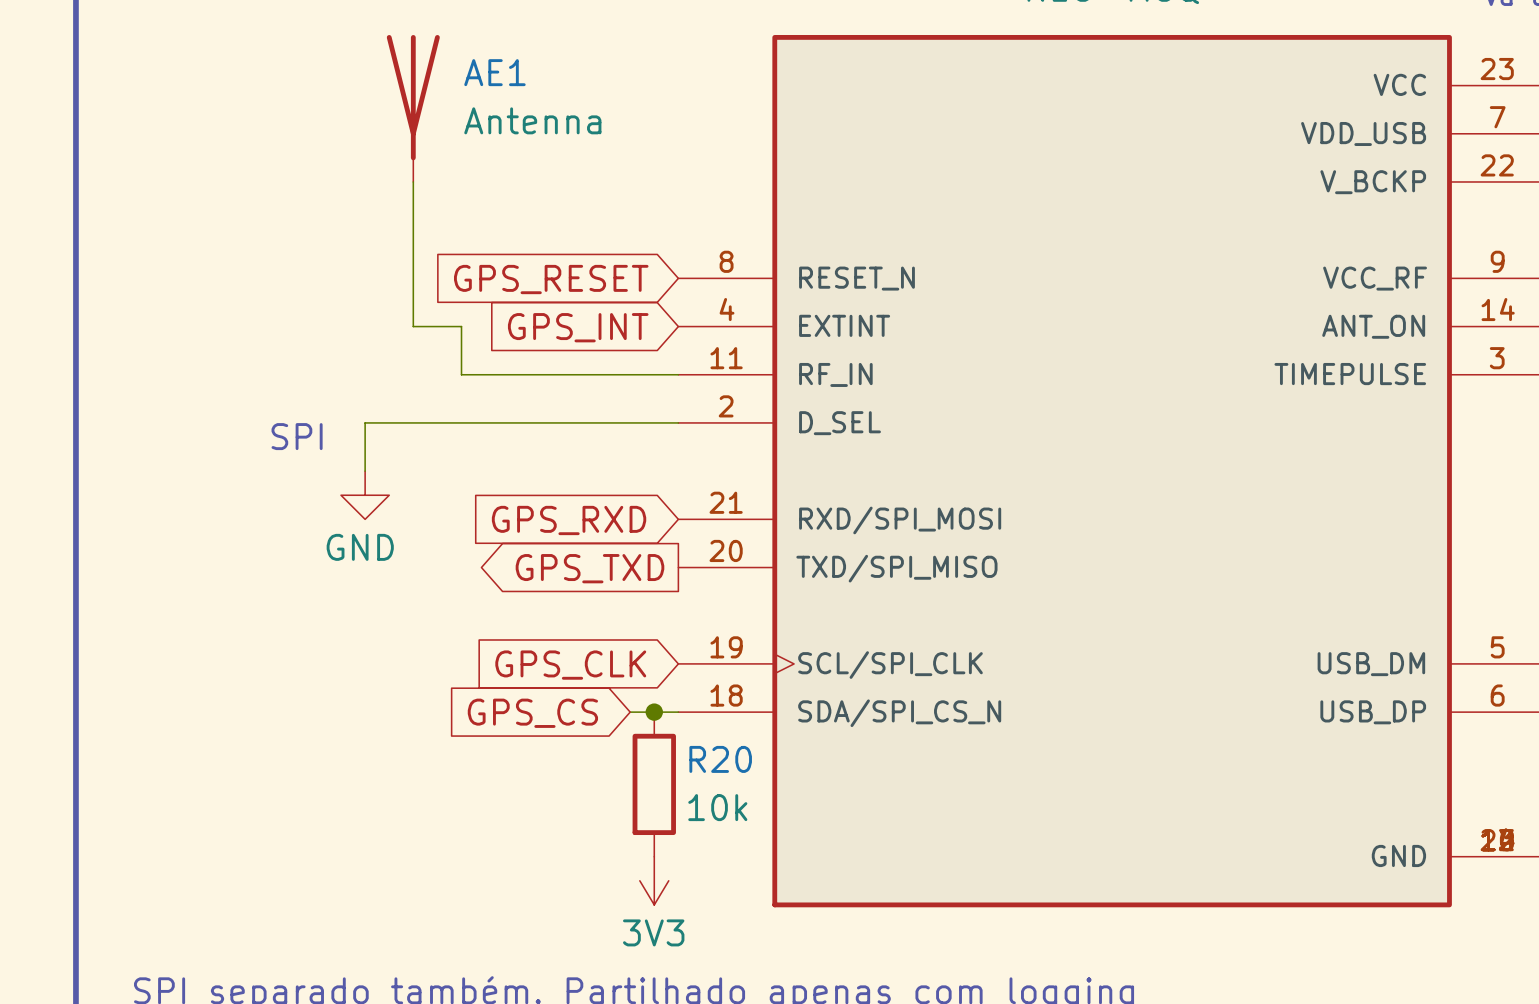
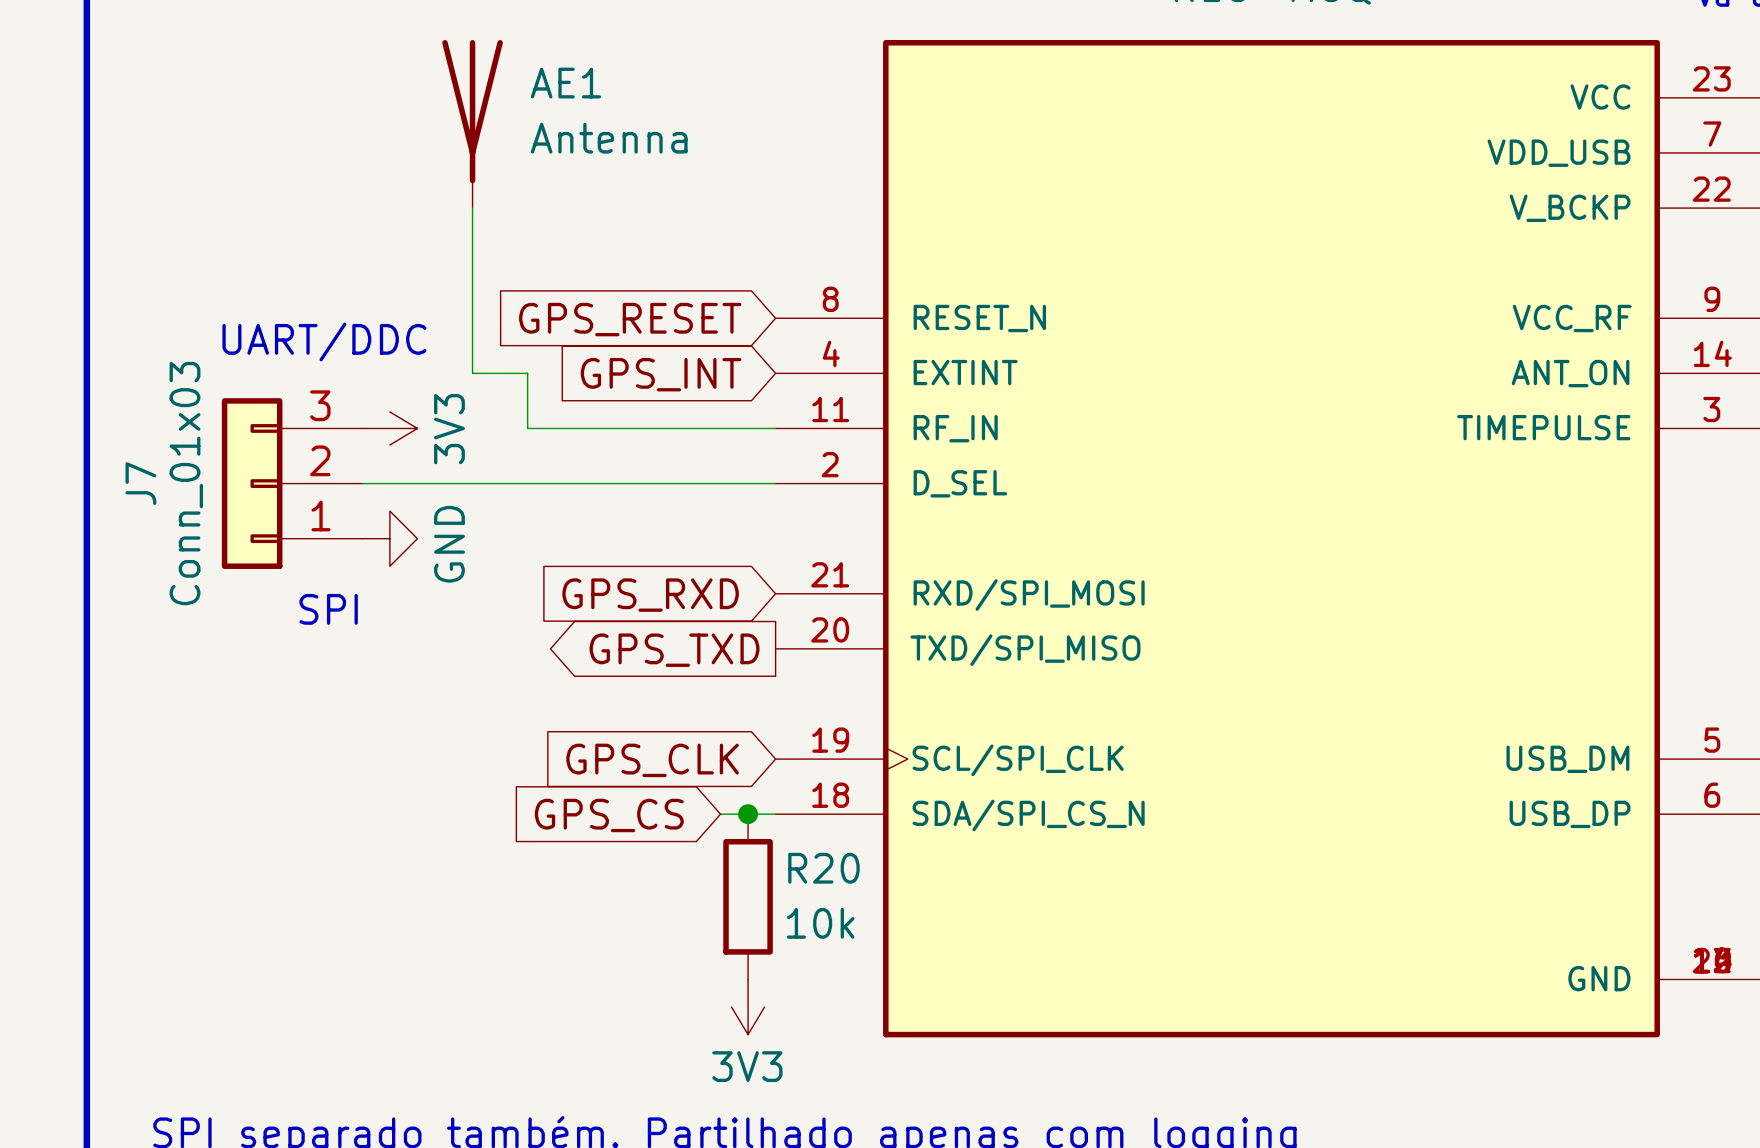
text: none -> UART/DDC (324, 341)
power symbol: none -> 3V3 (389, 428)
J7: none -> Conn_01x03 (292, 483)
wire: (365, 422) (365, 471) -> (417, 483) (362, 483)
text position: SPI (297, 436) -> SPI (328, 609)
power symbol rotation: 0° (365, 495) -> 90° counterclockwise (389, 538)
power symbol position: GND (365, 495) -> GND (389, 538)

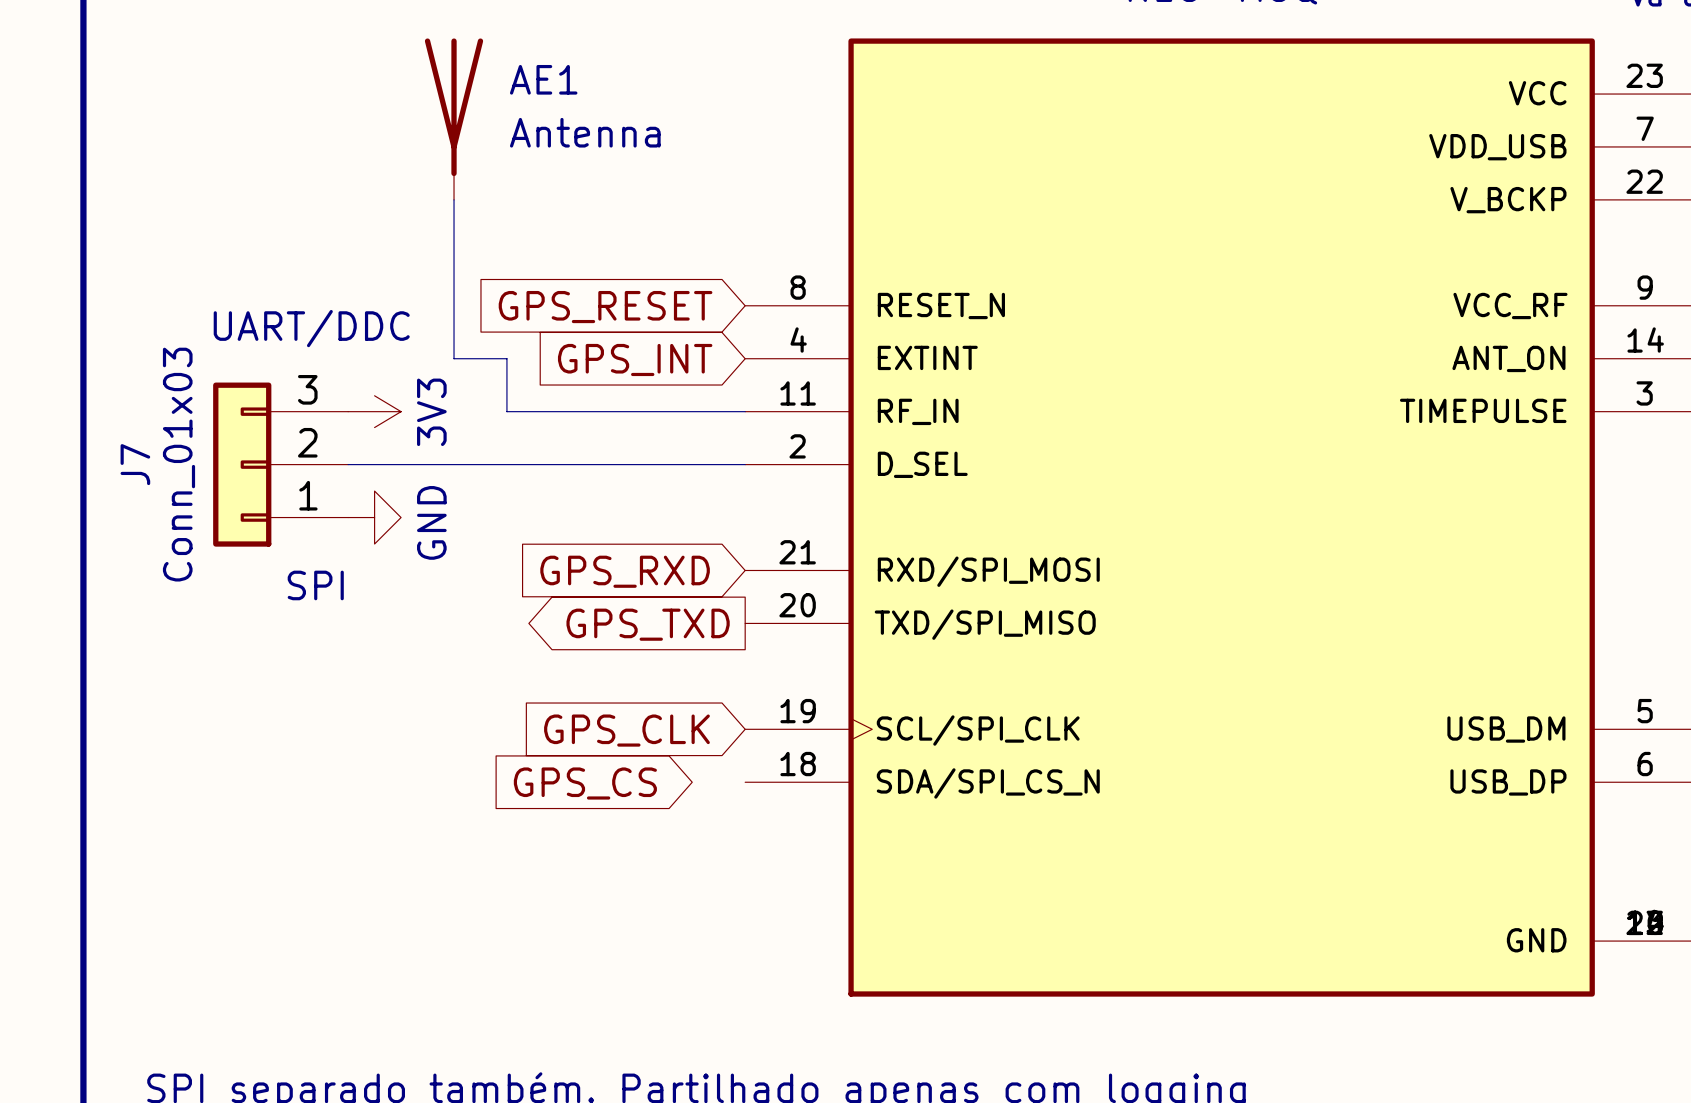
wire: (720, 814) (775, 814) -> none
junction: (748, 814) -> none
R20: 10k (748, 896) -> none
power symbol: 3V3 (748, 1007) -> none

